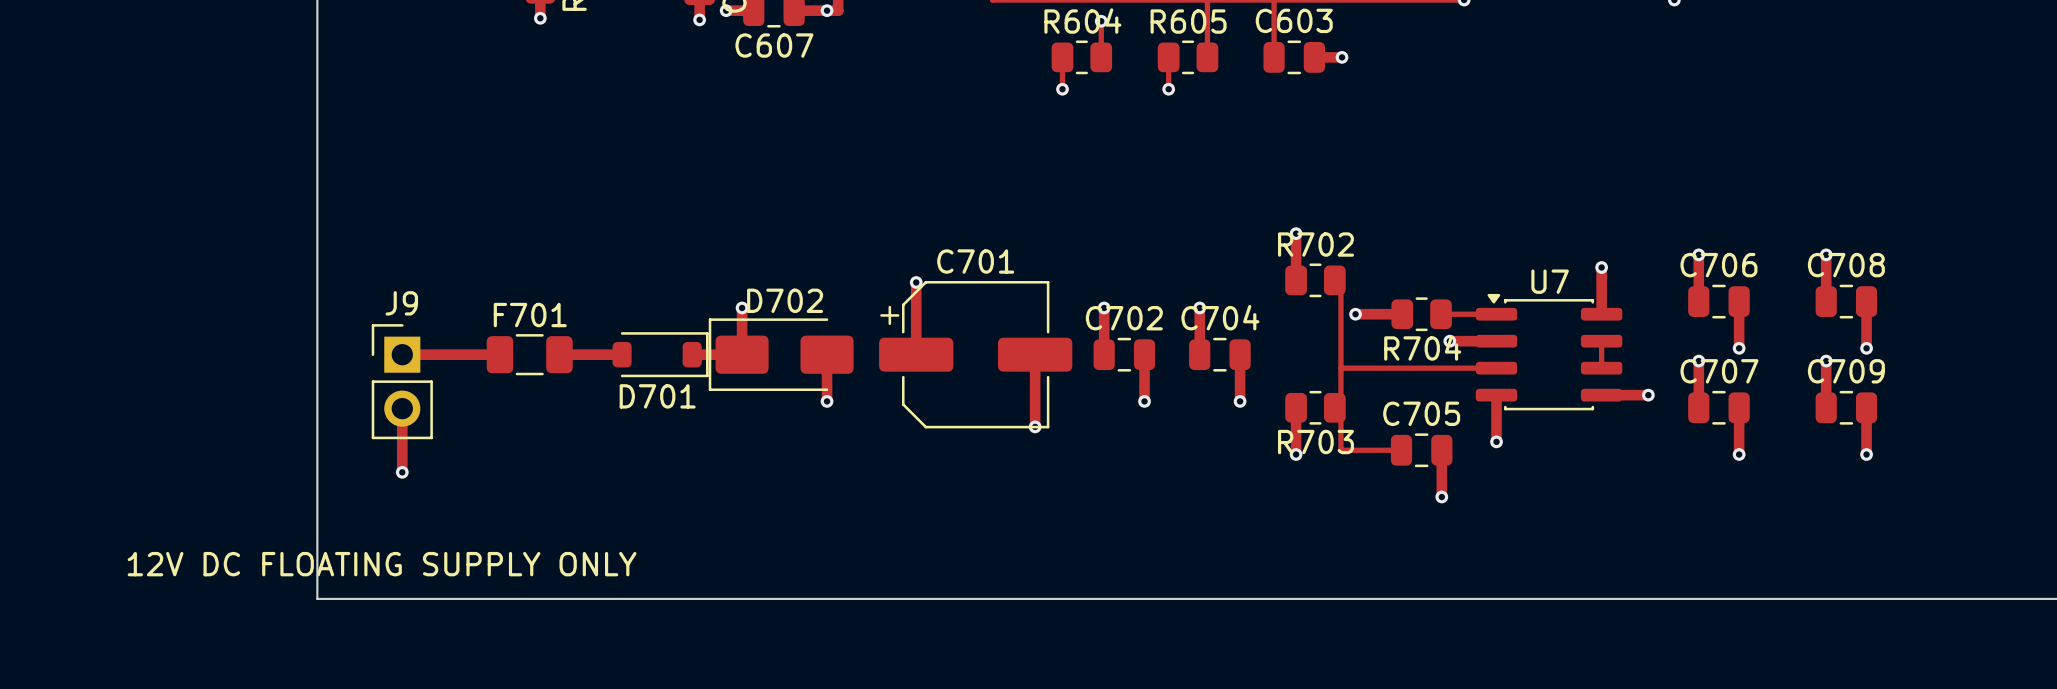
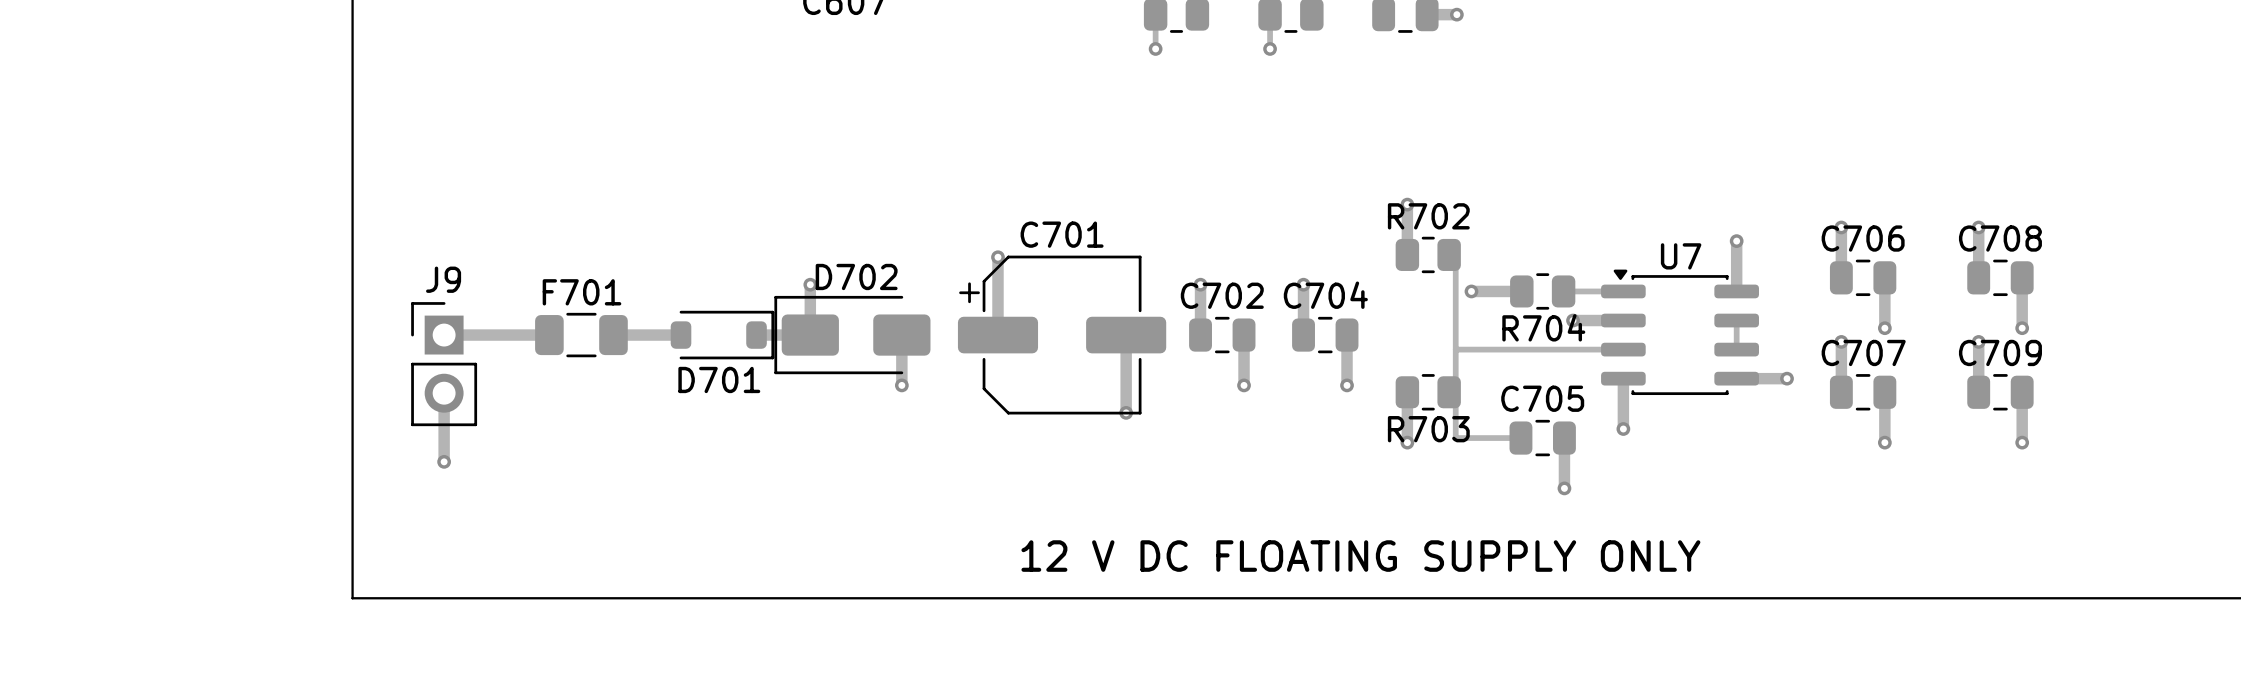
text: none -> 12 V DC FLOATING SUPPLY ONLY (1360, 556)
text: 12V DC FLOATING SUPPLY ONLY (382, 564) -> none

